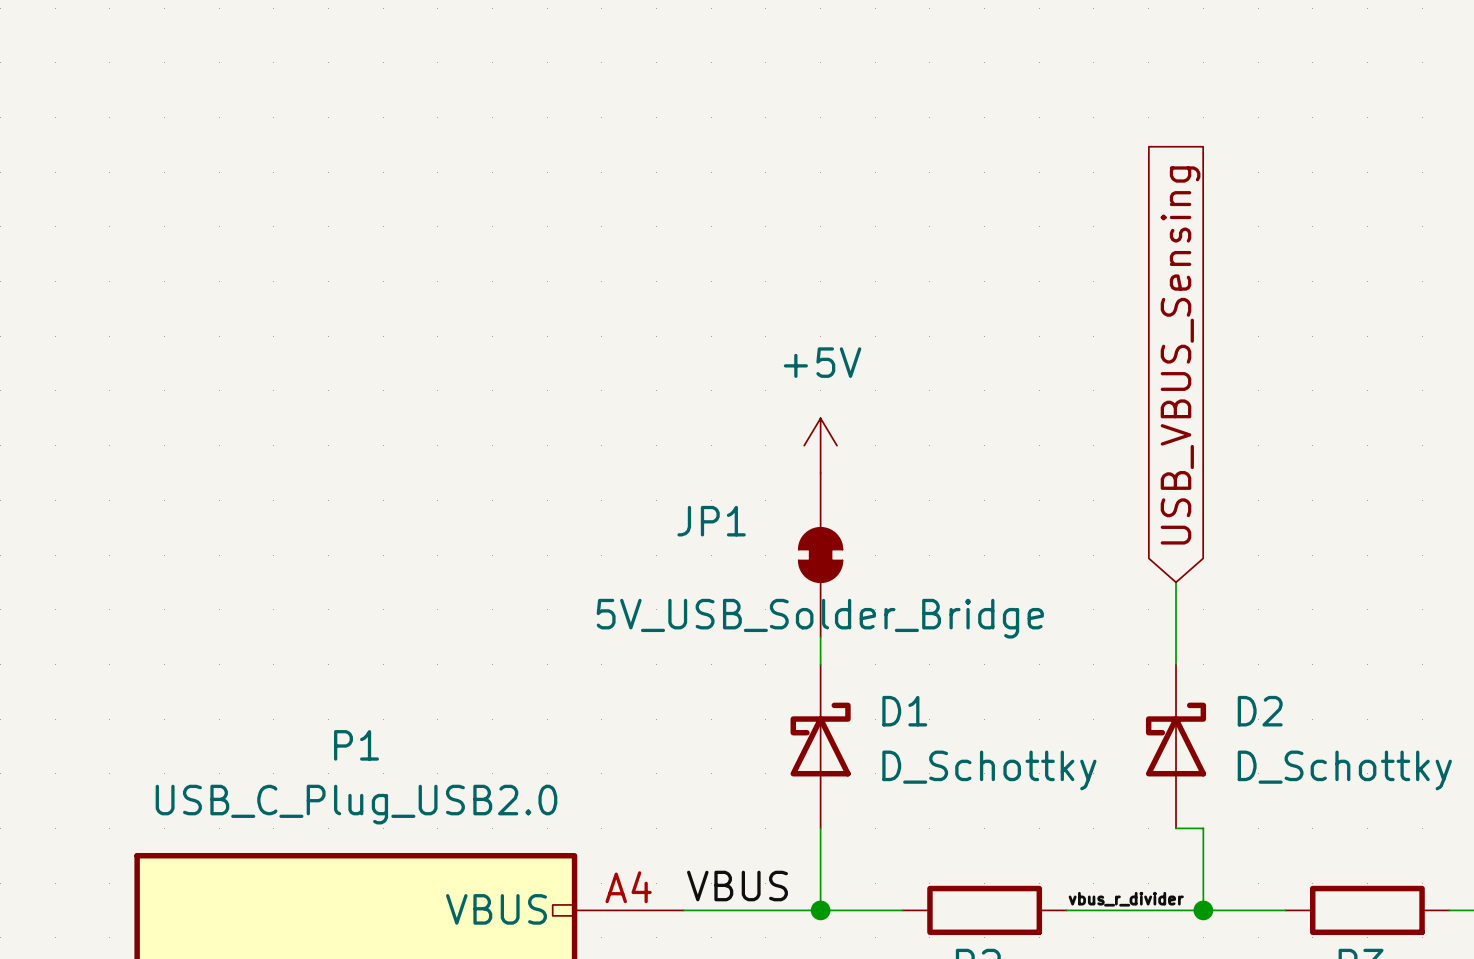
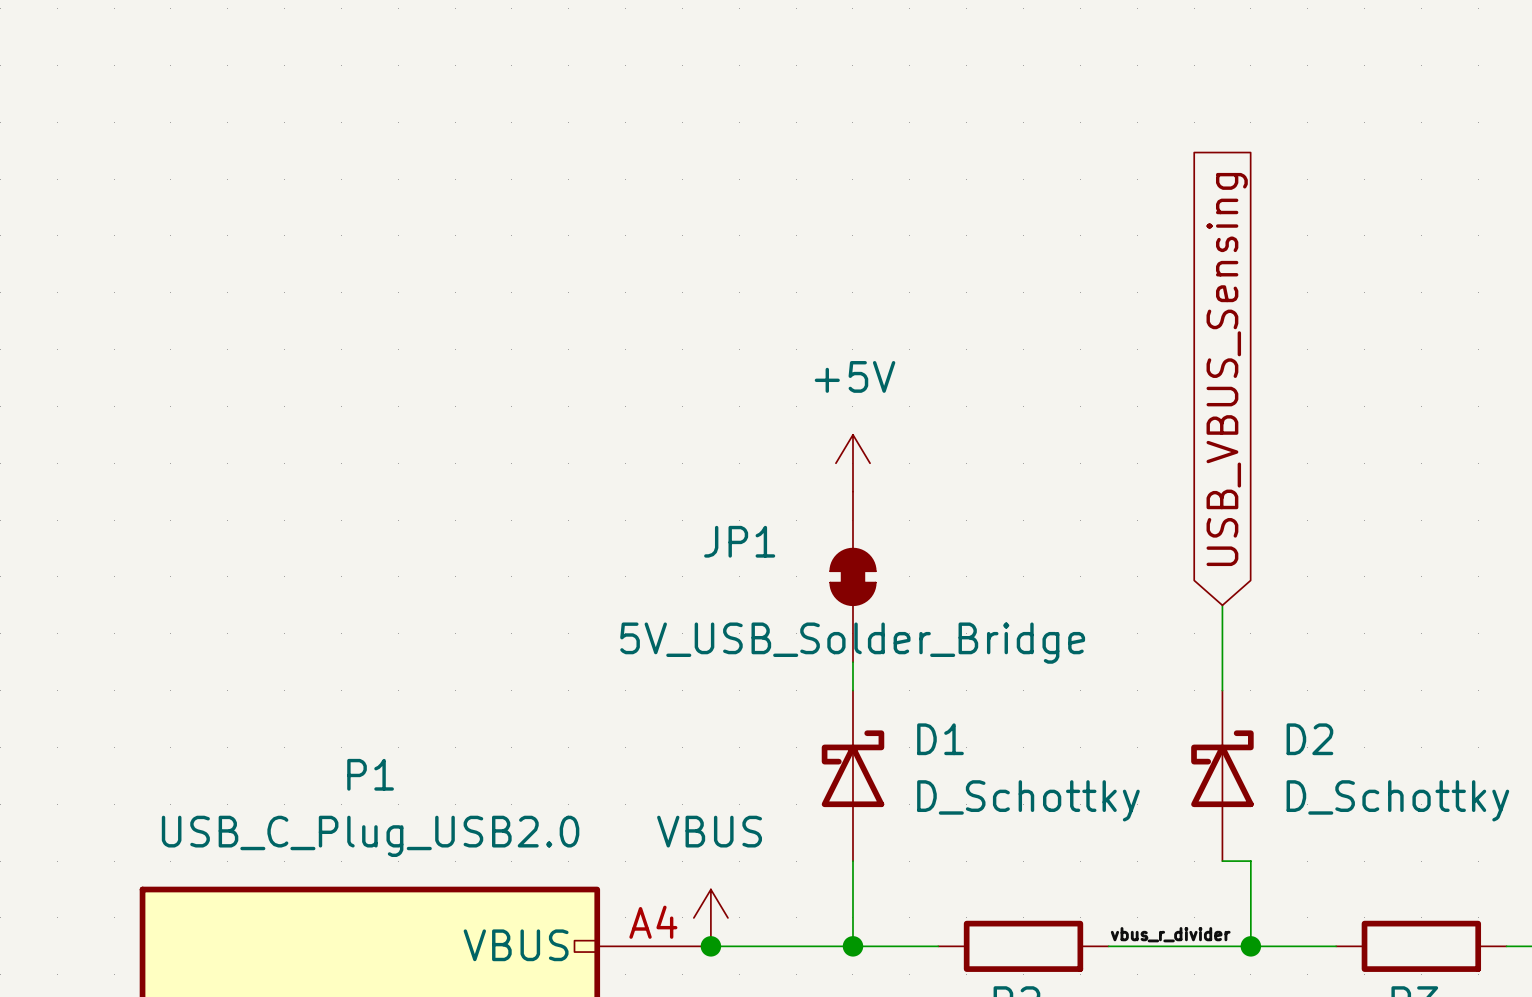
power symbol: none -> VBUS (710, 917)
label: VBUS (737, 886) -> none
junction: none -> (710, 946)

